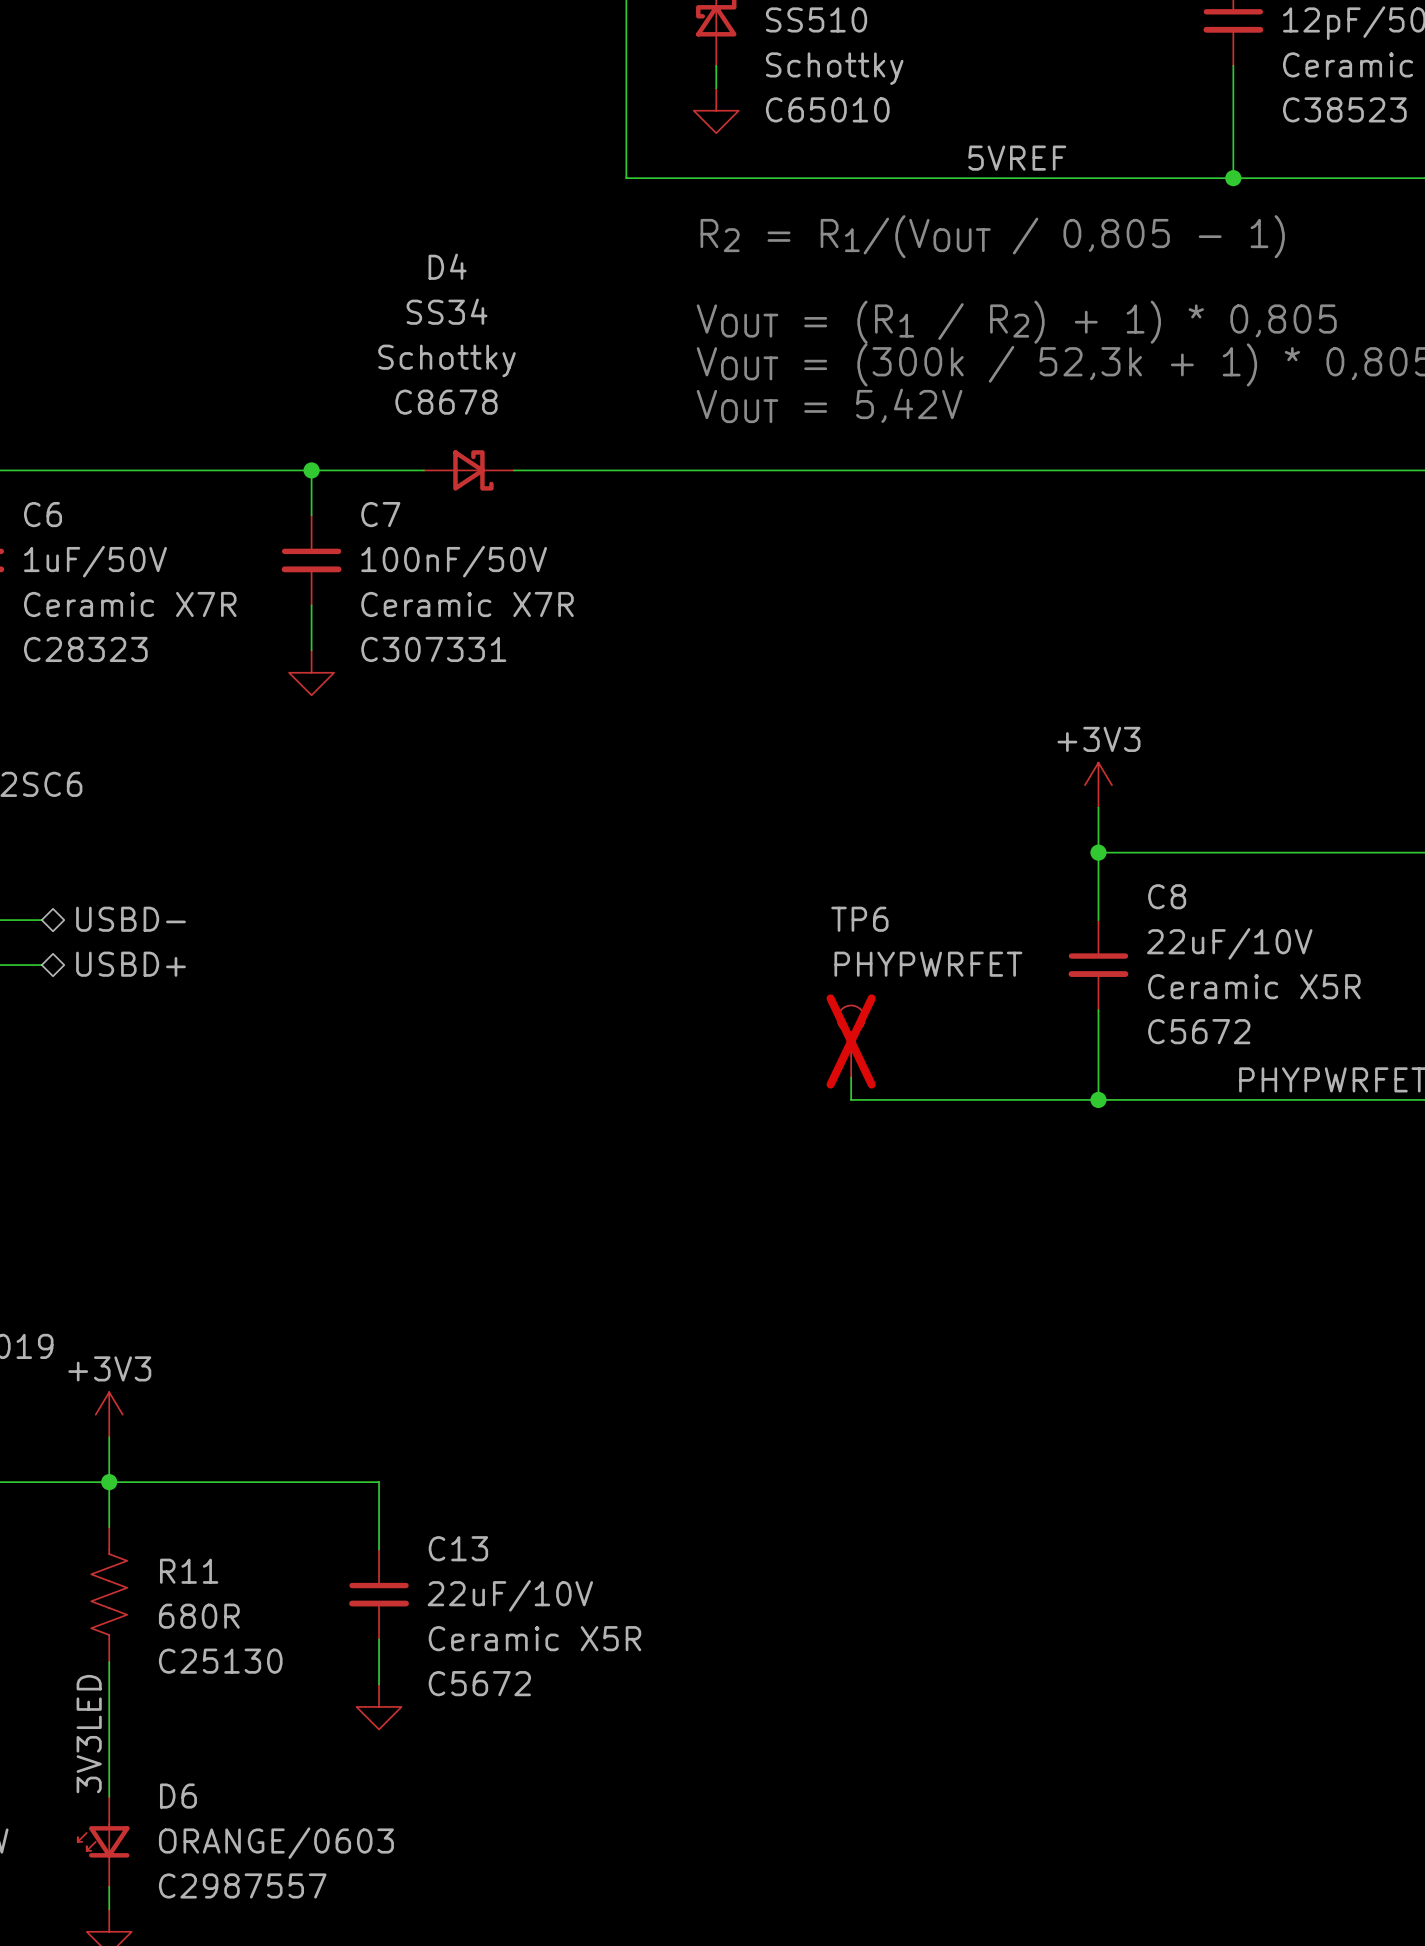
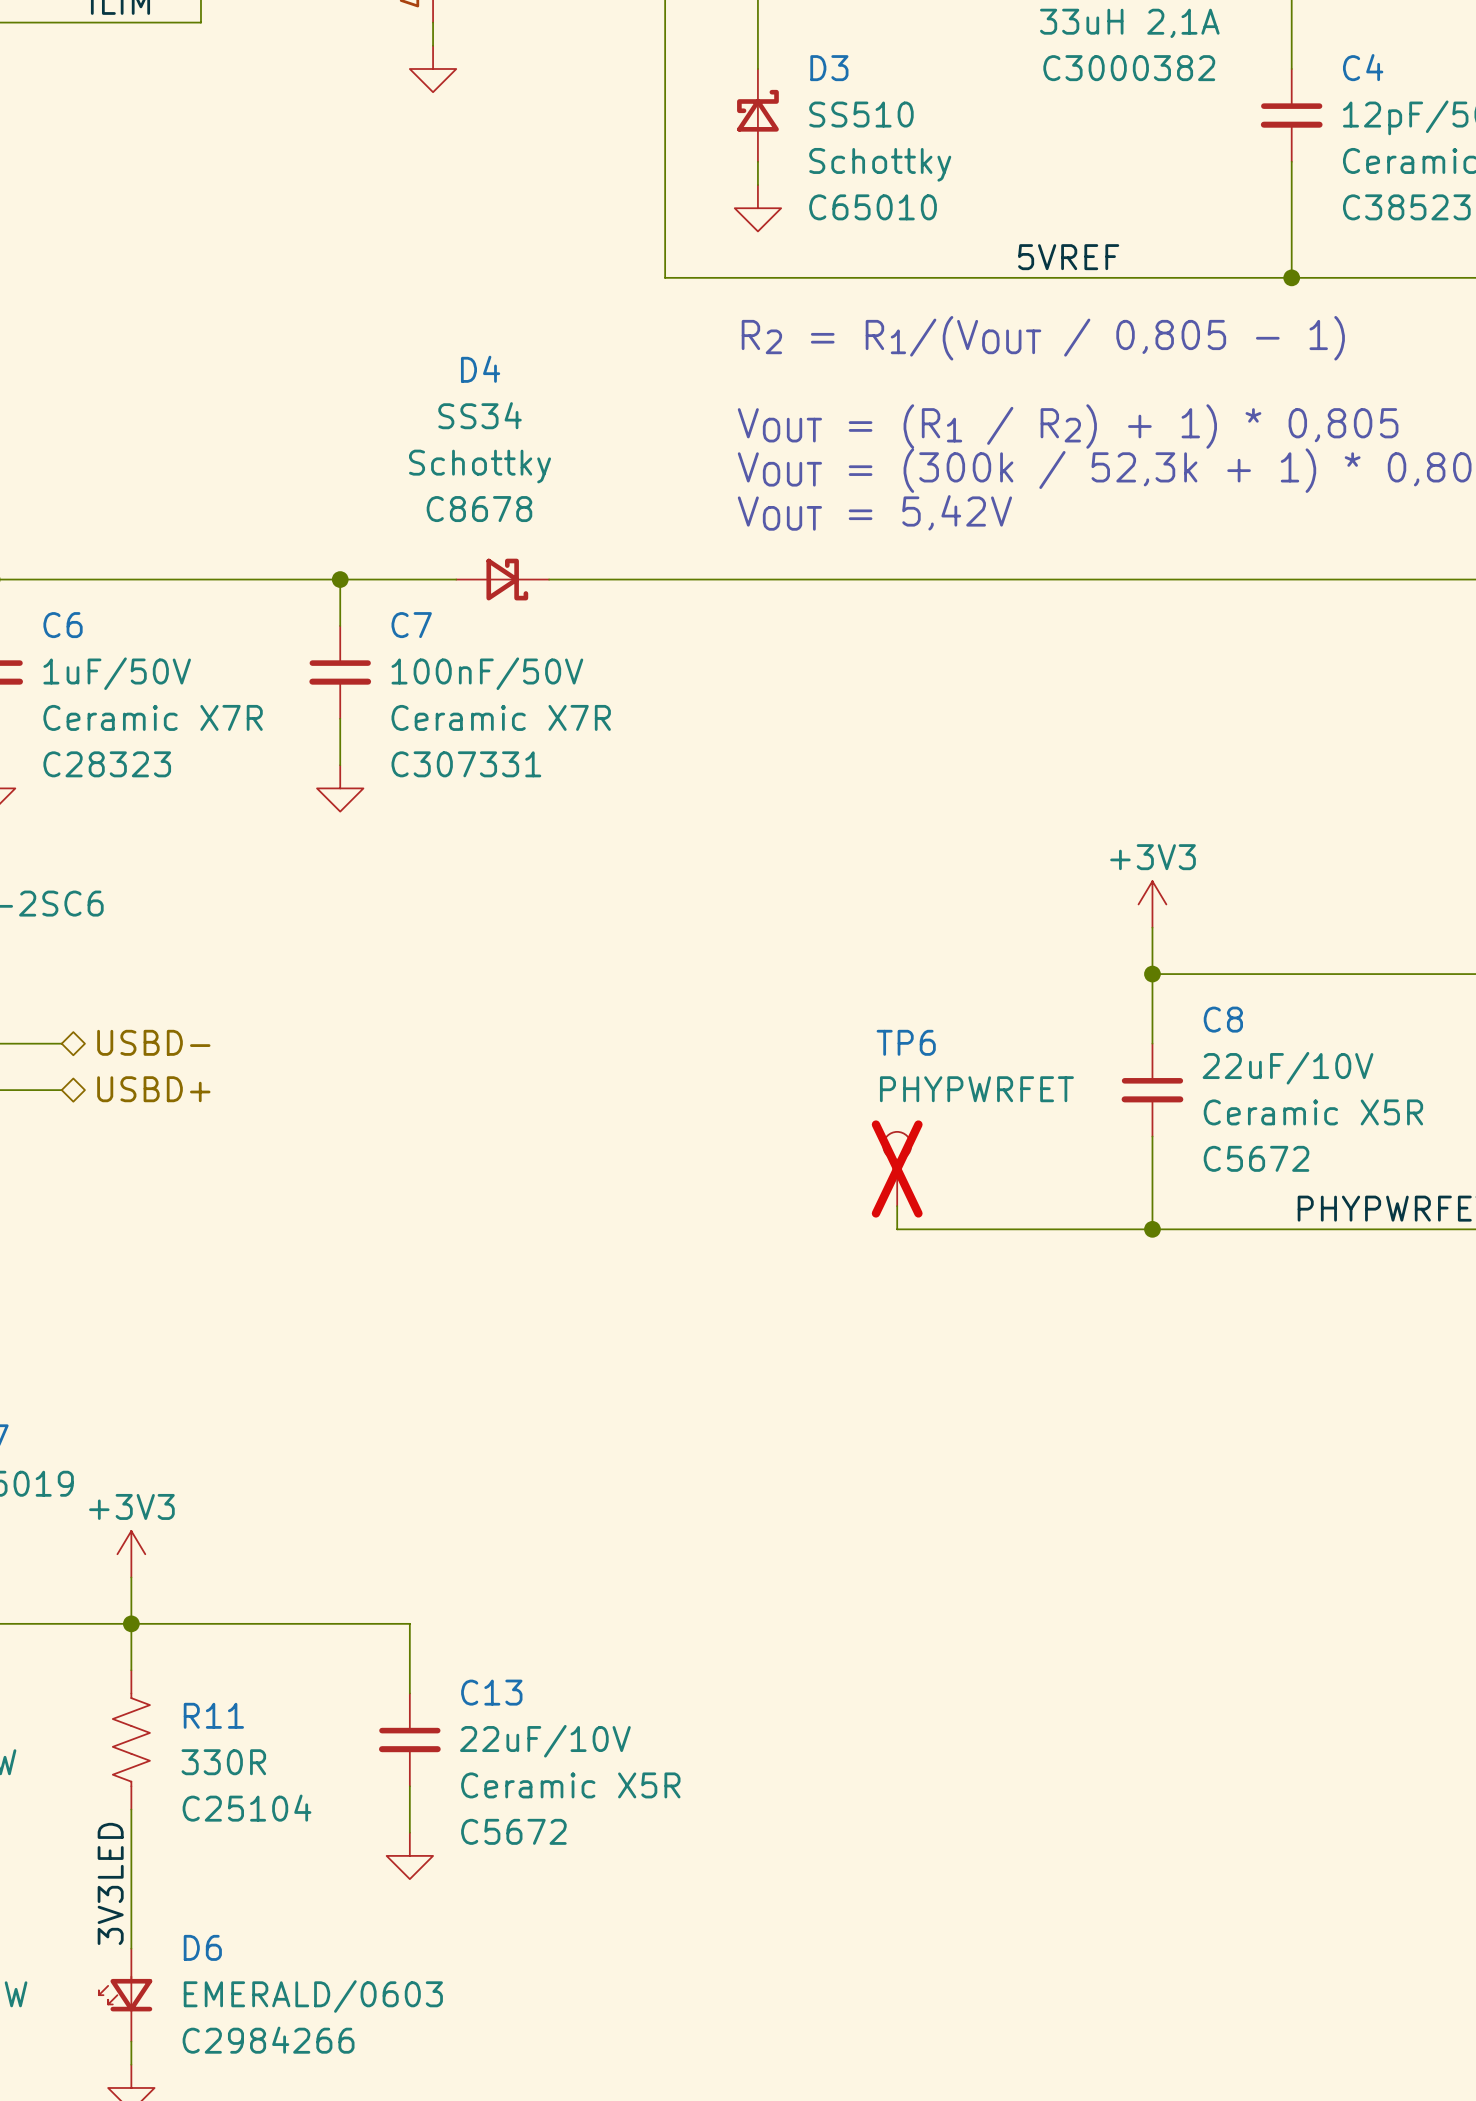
R11 value: 680R (199, 1616) -> 330R (223, 1762)
R11 text: C25130 (220, 1661) -> C25104 (247, 1808)
D6 value: ORANGE/0603 (276, 1843) -> EMERALD/0603 (313, 1996)
D6 text: C2987557 (242, 1885) -> C2984266 (268, 2040)

